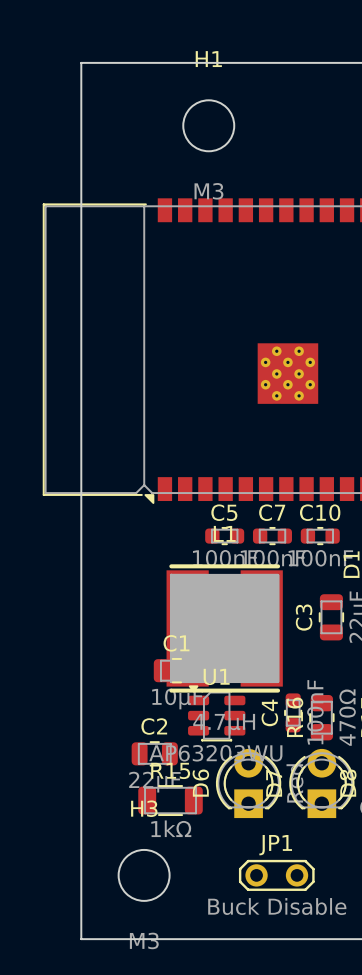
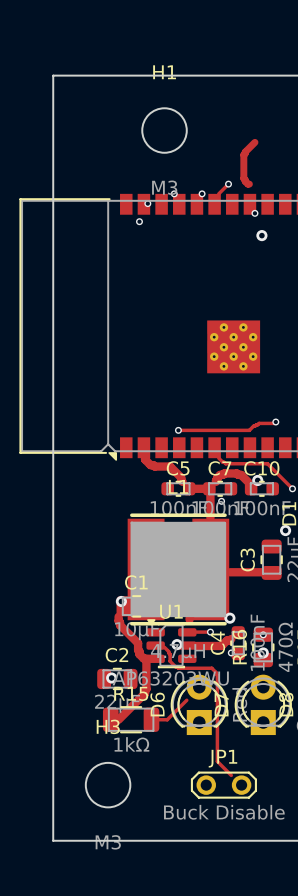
track: none -> (254, 142) (243, 154) (243, 178) (249, 184)
track: none -> (228, 184) (218, 193)
via: none -> (228, 184)
via: none -> (174, 193)
via: none -> (202, 193)
via: none -> (147, 203)
via: none -> (254, 213)
via: none -> (139, 221)
via: none -> (261, 235)
track: none -> (275, 422) (259, 423) (249, 430) (178, 430)
via: none -> (275, 422)
via: none -> (178, 430)
track: none -> (145, 458) (150, 465) (170, 466) (181, 477) (182, 481)
track: none -> (218, 458) (225, 463) (267, 463) (292, 488)
via: none -> (257, 480)
track: none -> (216, 481) (217, 477) (224, 473) (241, 474) (247, 481)
track: none -> (195, 488) (203, 488)
via: none -> (292, 488)
track: none -> (210, 495) (210, 518)
via: none -> (221, 501)
via: none -> (285, 530)
track: none -> (229, 572) (261, 572)
via: none -> (121, 601)
track: none -> (118, 616) (120, 625) (138, 643) (139, 654) (146, 658)
track: none -> (189, 618) (189, 619)
via: none -> (229, 618)
track: none -> (196, 632) (210, 632)
via: none -> (210, 632)
via: none -> (263, 634)
track: none -> (231, 639) (221, 646) (196, 646)
via: none -> (177, 644)
track: none -> (164, 647) (170, 654) (170, 661) (178, 668) (211, 668) (216, 672) (217, 761) (231, 775)
via: none -> (231, 652)
via: none -> (263, 652)
track: none -> (146, 662) (145, 693) (118, 719)
via: none -> (111, 677)
track: none -> (186, 700) (167, 719) (158, 719)

